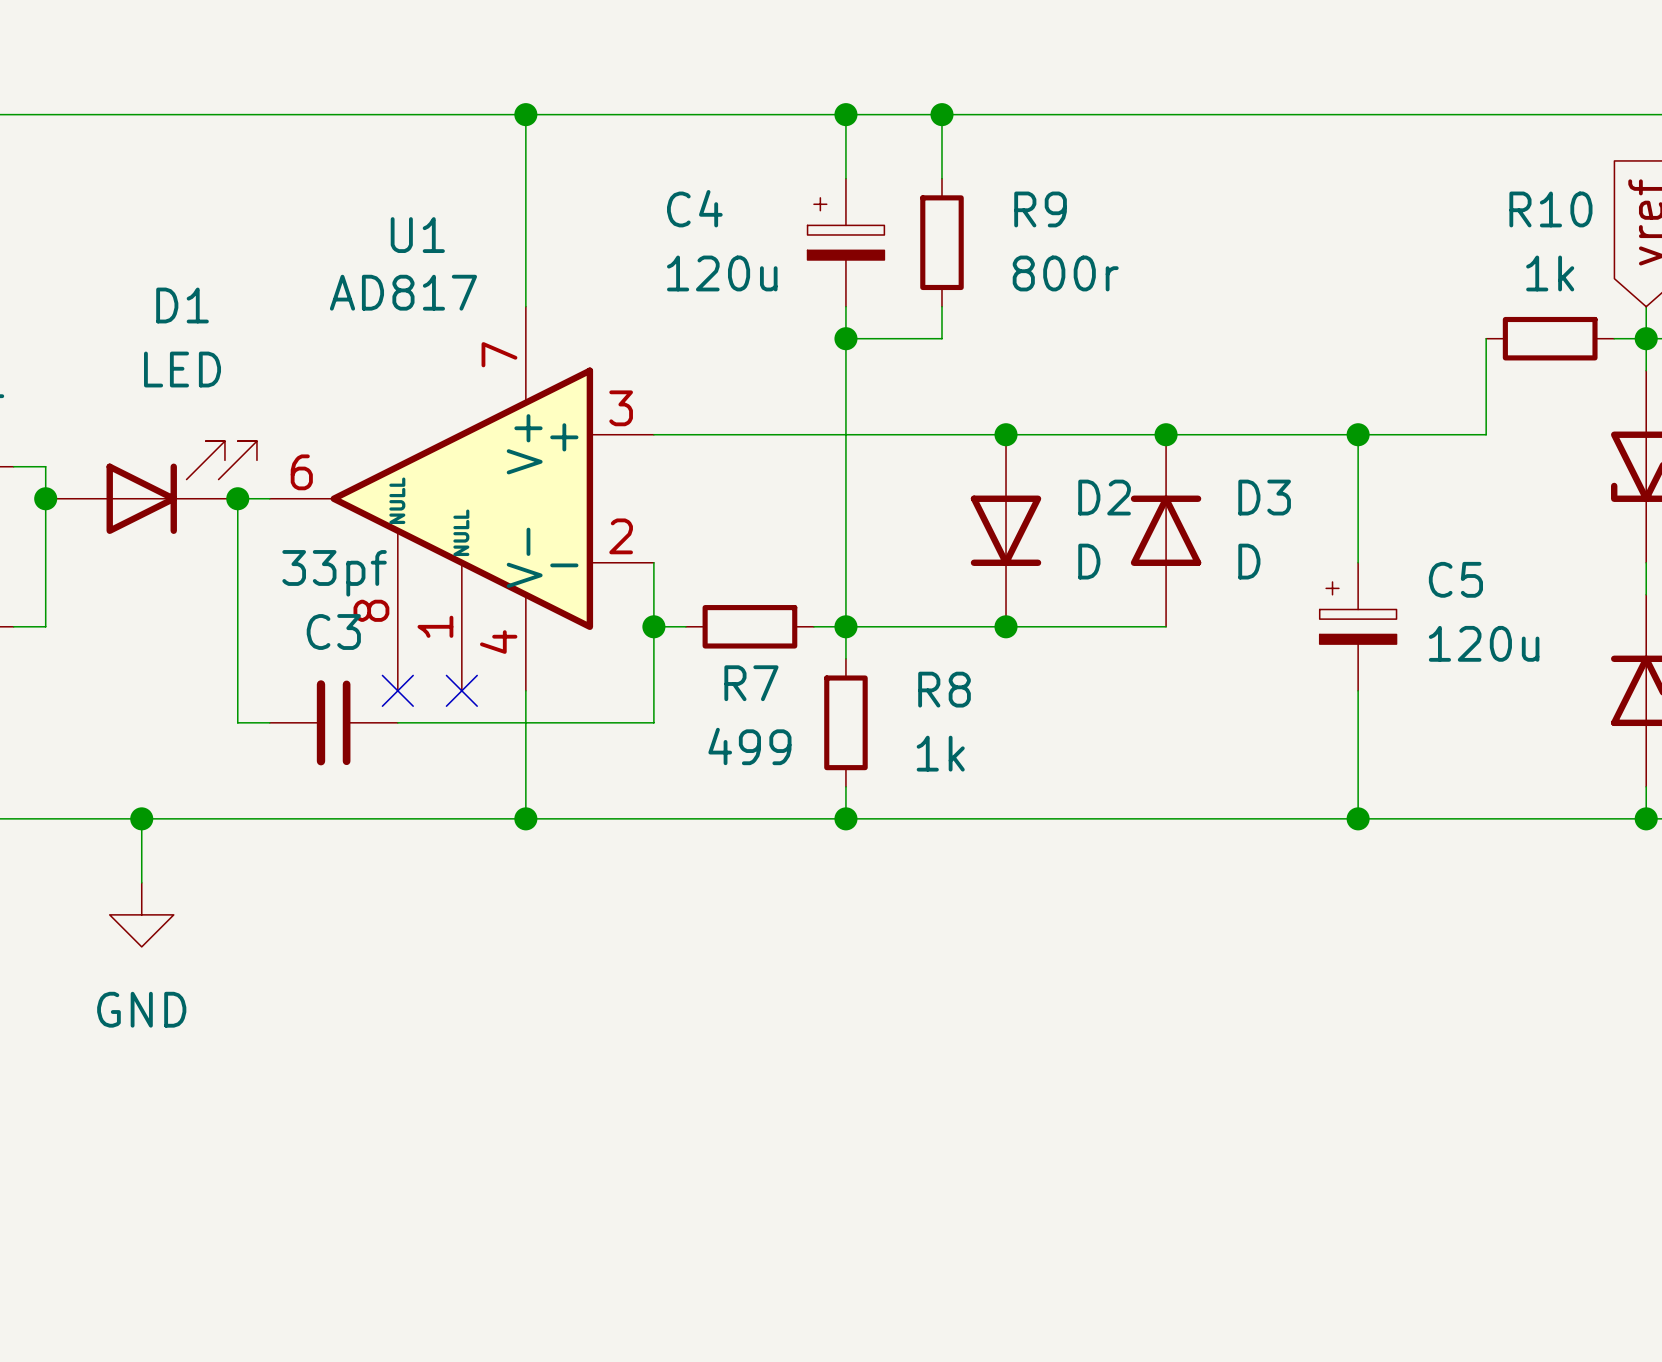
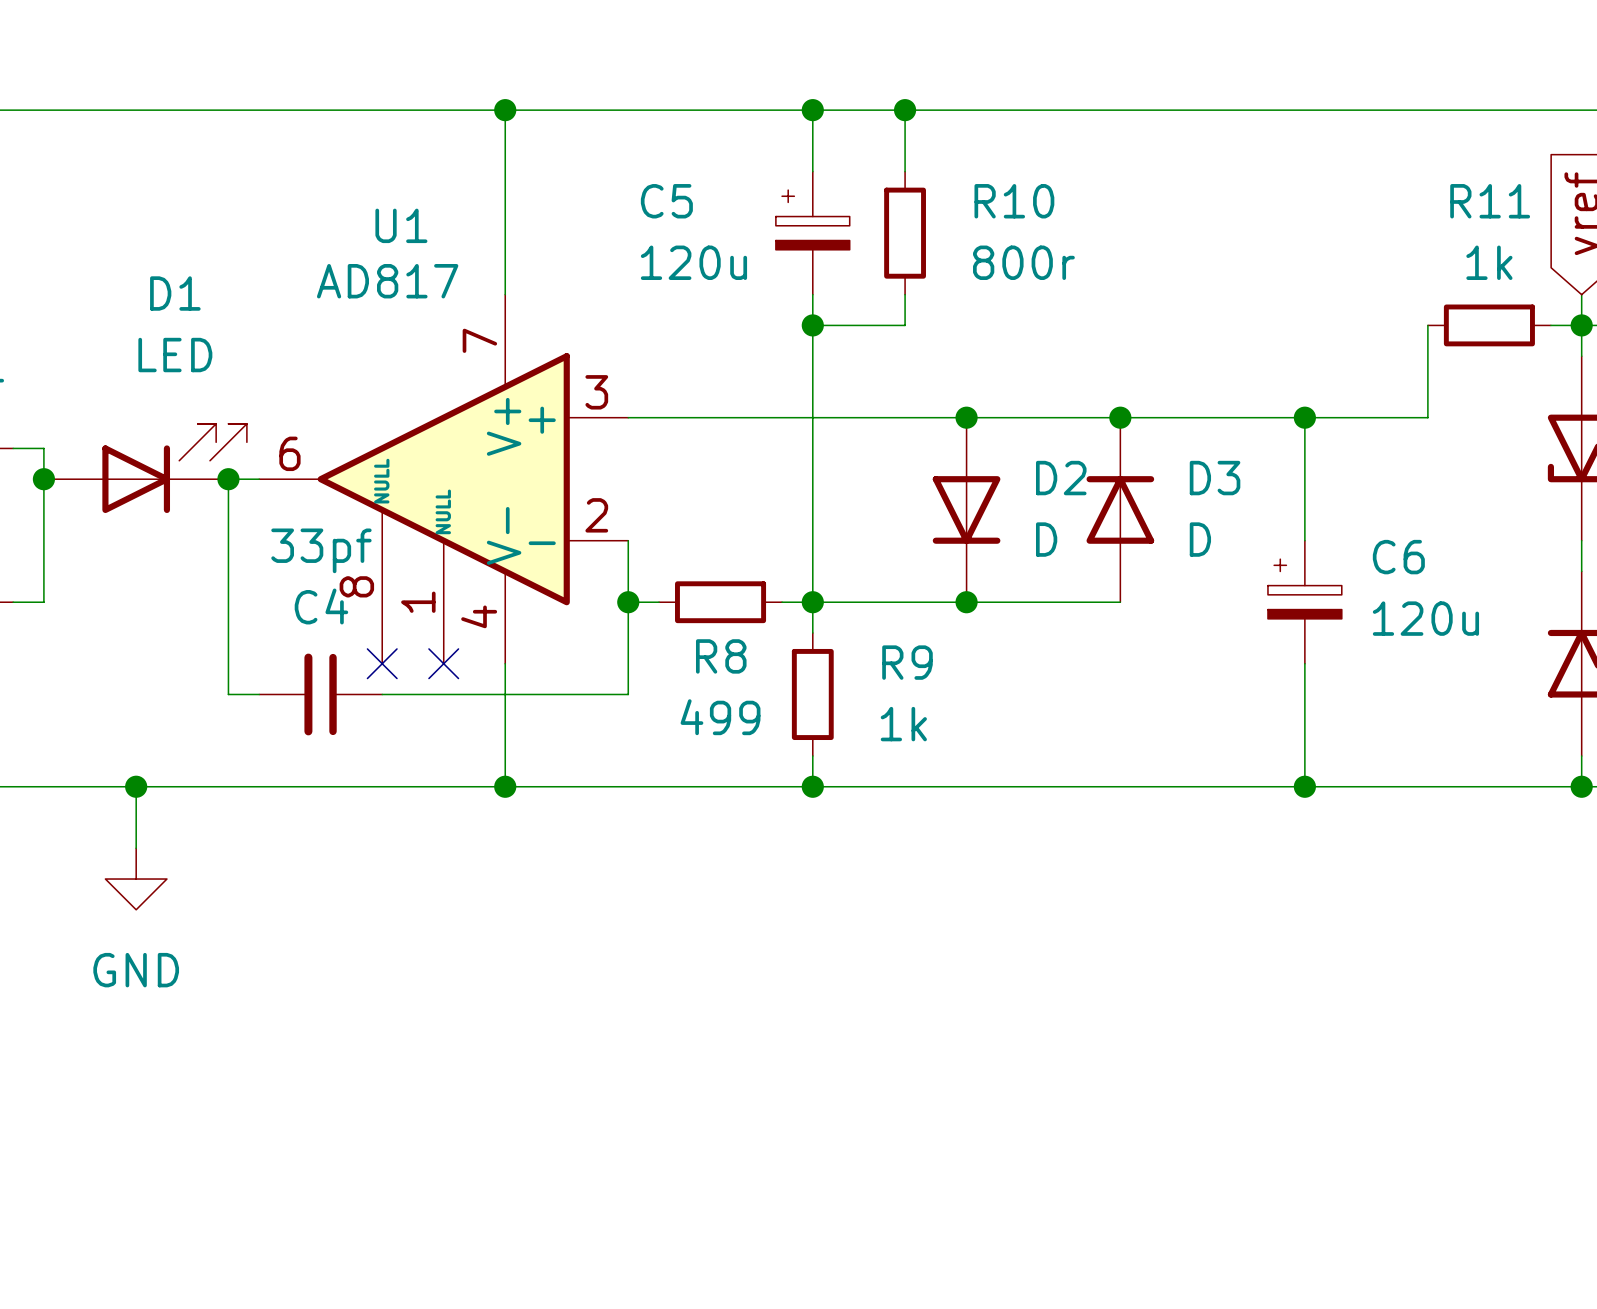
C4 name: C4 (694, 208) -> C5 (666, 201)
R9 name: R9 (1040, 209) -> R10 (1014, 201)
R10 name: R10 (1550, 209) -> R11 (1490, 201)
C5 name: C5 (1455, 579) -> C6 (1398, 557)
C3 name: C3 (333, 632) -> C4 (321, 606)
R7 name: R7 (751, 683) -> R8 (721, 656)
R8 name: R8 (944, 689) -> R9 (907, 662)

